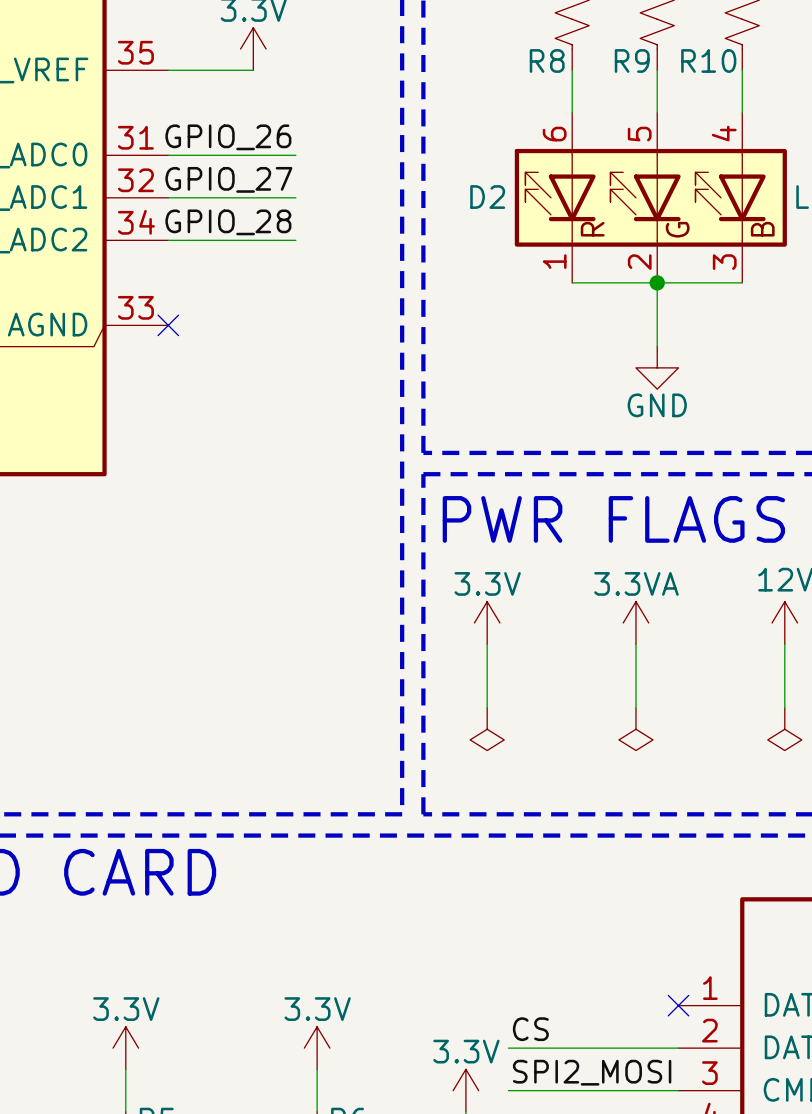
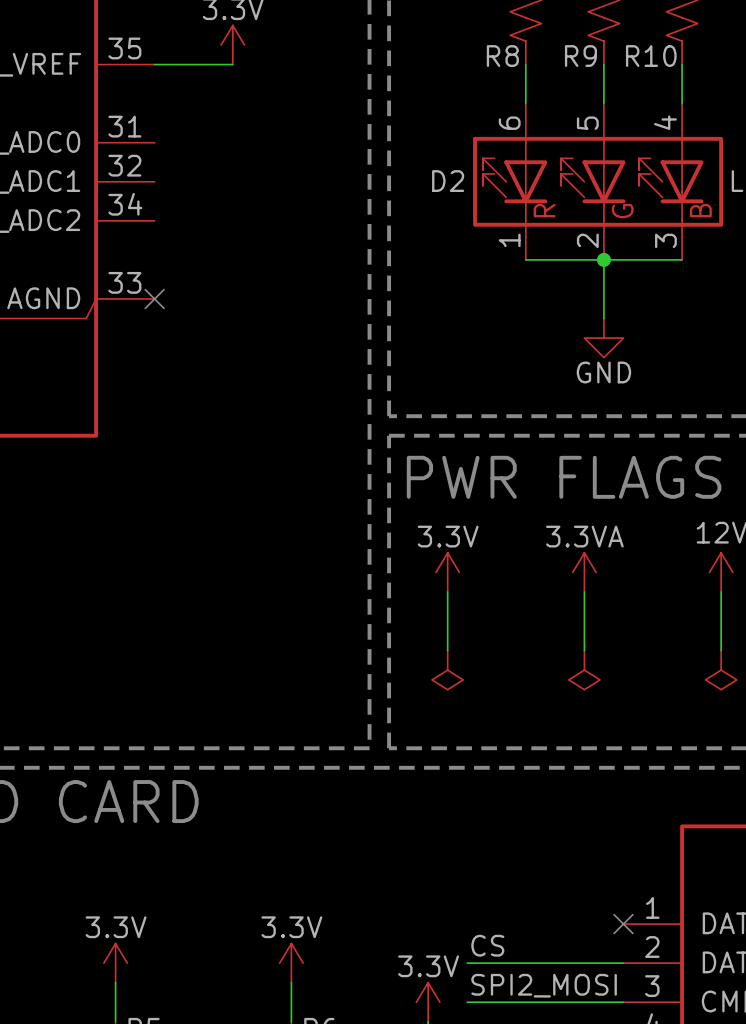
label: GPIO_26 (228, 137) -> none
wire: (168, 155) (295, 155) -> none
label: GPIO_27 (228, 179) -> none
wire: (168, 197) (295, 197) -> none
label: GPIO_28 (228, 222) -> none
wire: (168, 240) (295, 240) -> none

